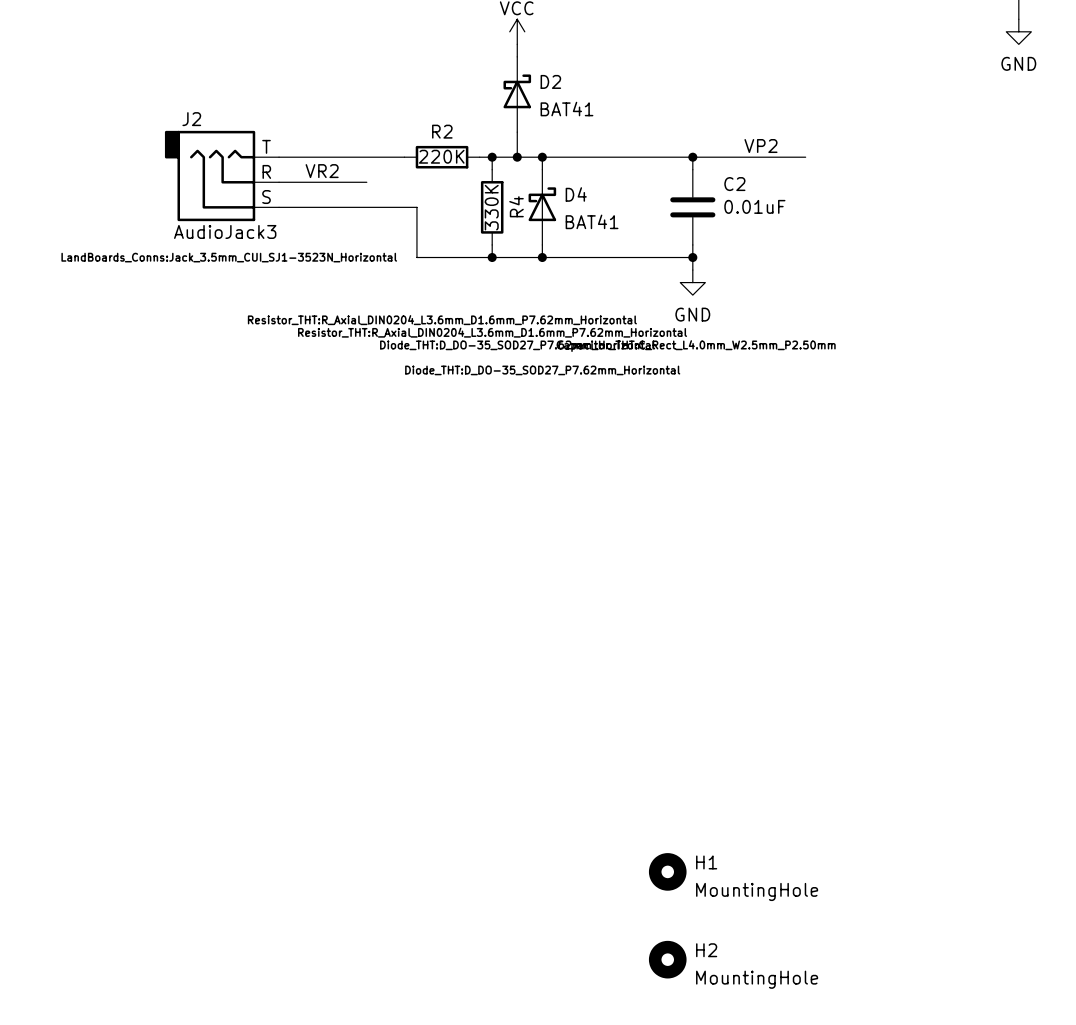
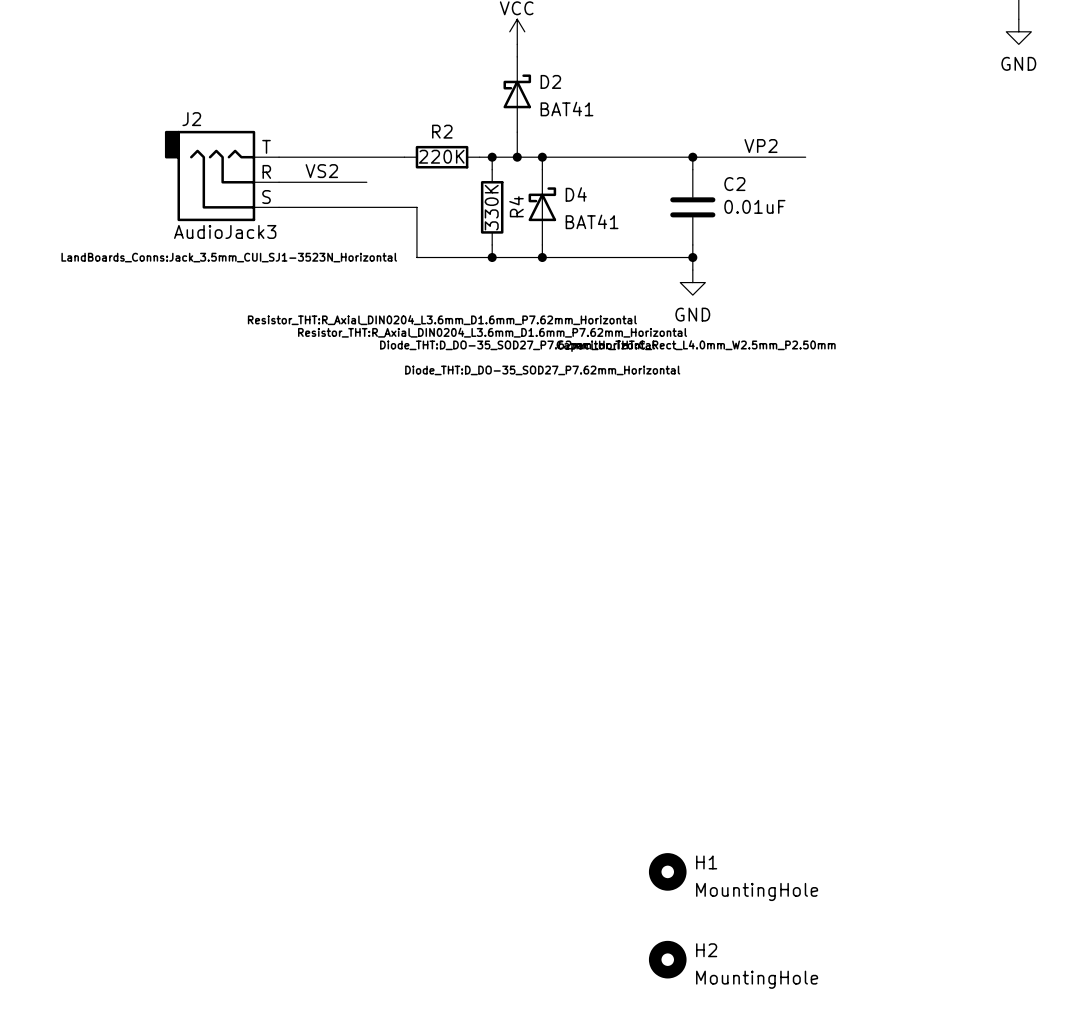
label: VR2 (322, 171) -> VS2 (321, 171)

